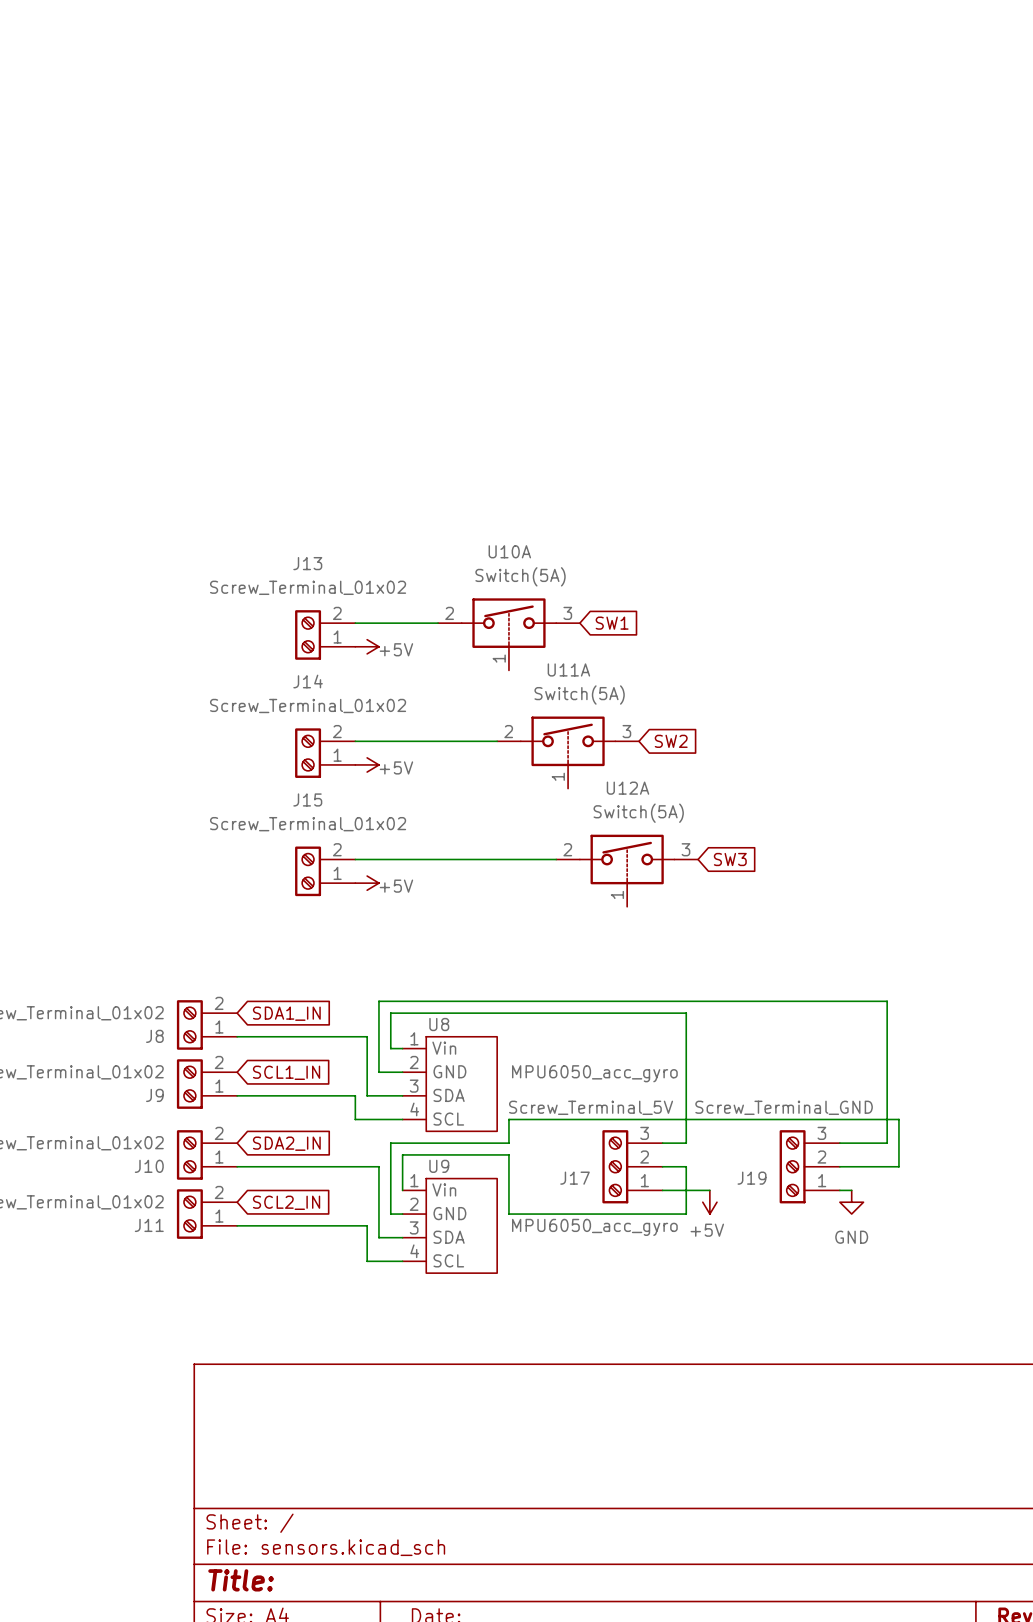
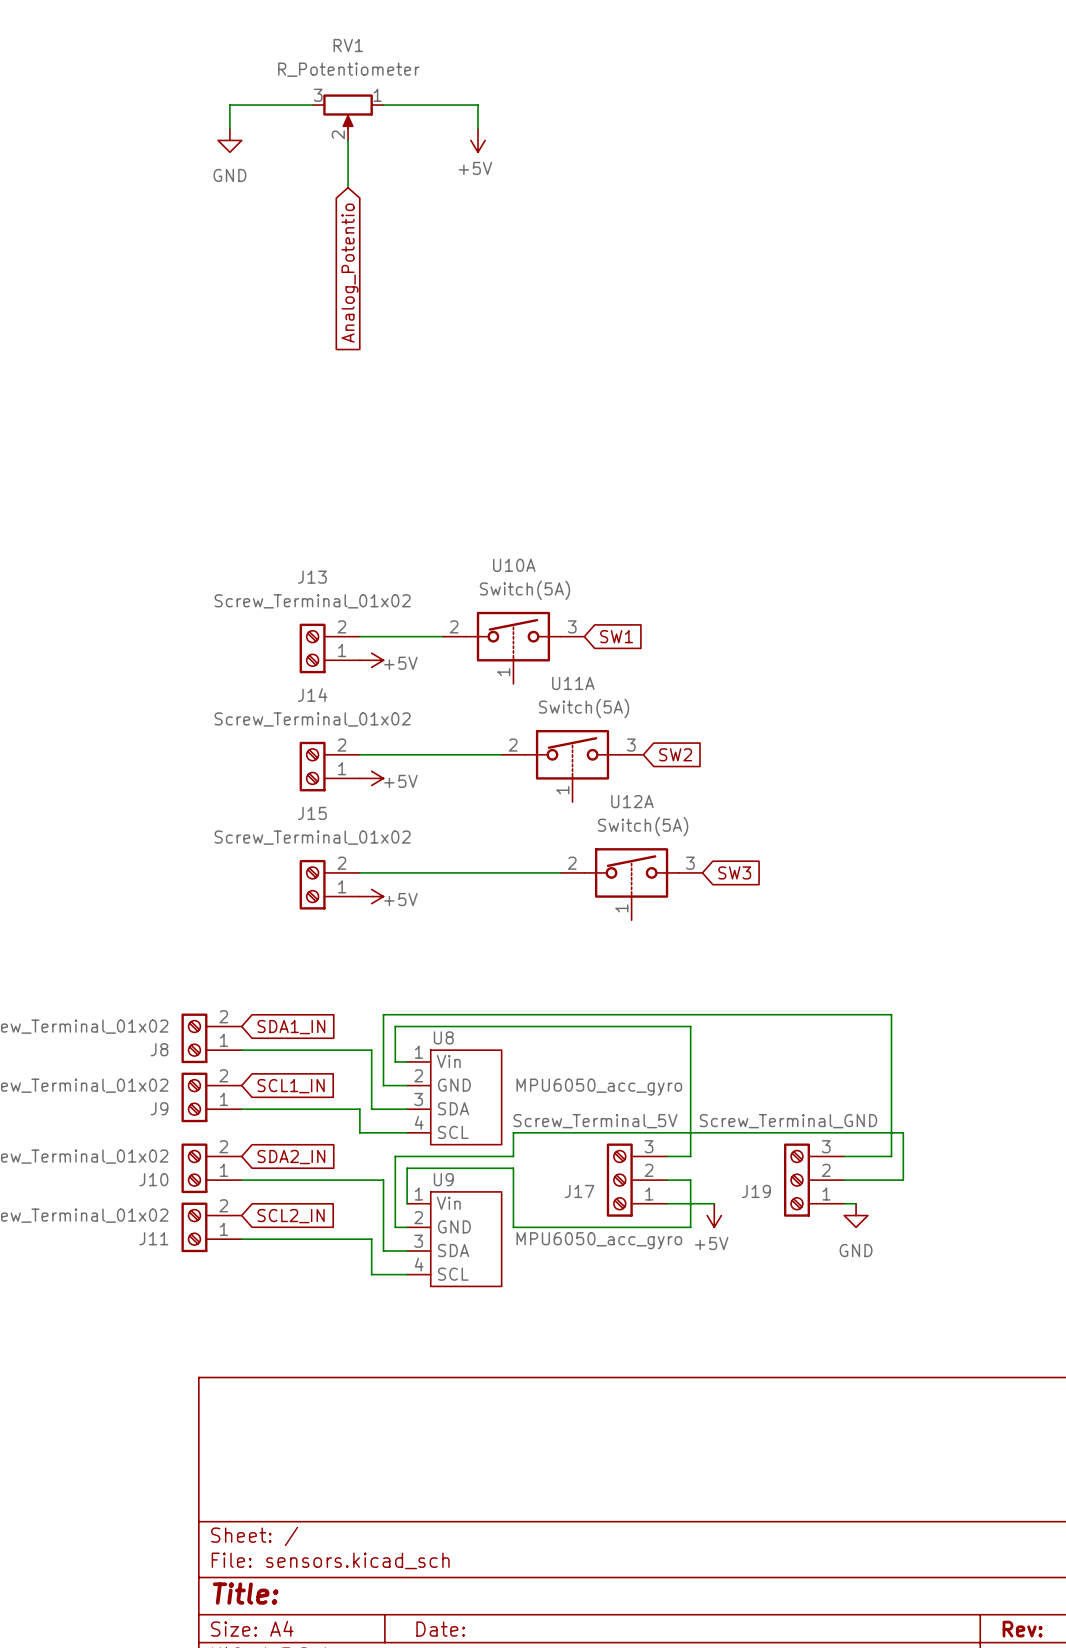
wire: none -> (312, 105) (229, 105) (229, 128)
wire: none -> (383, 105) (478, 105) (478, 128)
RV1: none -> R_Potentiometer (348, 117)
power symbol: none -> GND (229, 140)
wire: none -> (348, 140) (348, 187)
power symbol: none -> +5V (478, 140)
global label: none -> Analog_Potentio (350, 273)

